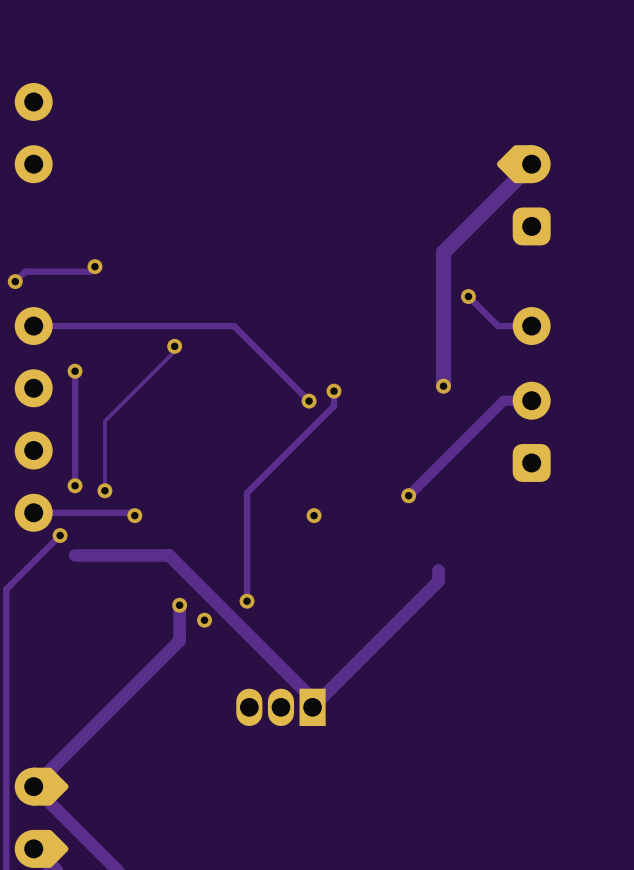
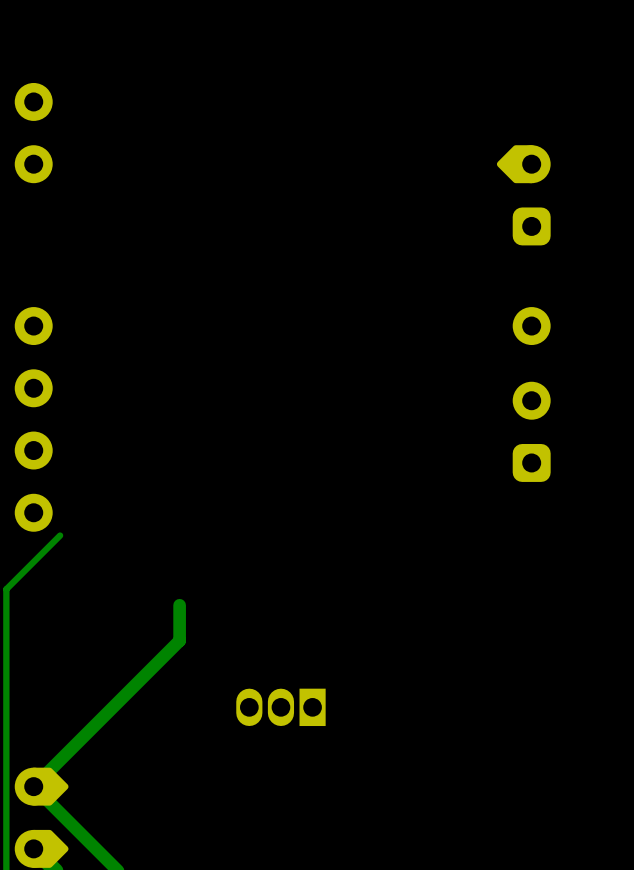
track: (531, 164) (443, 252) (443, 386) -> none
track: (94, 266) (89, 271) (25, 271) (15, 281) -> none
via: (94, 266) -> none
via: (15, 281) -> none
track: (468, 296) (497, 326) (531, 326) -> none
via: (468, 296) -> none
track: (33, 326) (234, 326) (309, 401) -> none
track: (174, 346) (174, 351) (104, 421) (104, 490) -> none
via: (174, 346) -> none
track: (75, 371) (75, 485) -> none
via: (75, 371) -> none
via: (443, 386) -> none
track: (333, 391) (333, 406) (247, 493) (247, 601) -> none
via: (333, 391) -> none
track: (531, 400) (503, 400) (408, 495) -> none
via: (309, 401) -> none
via: (75, 485) -> none
via: (104, 490) -> none
via: (408, 495) -> none
track: (33, 512) (131, 512) (134, 515) -> none
via: (134, 515) -> none
via: (314, 515) -> none
via: (60, 535) -> none
track: (75, 555) (169, 555) (312, 698) (312, 707) (438, 581) (438, 570) -> none
via: (247, 601) -> none
via: (179, 605) -> none
via: (204, 620) -> none

